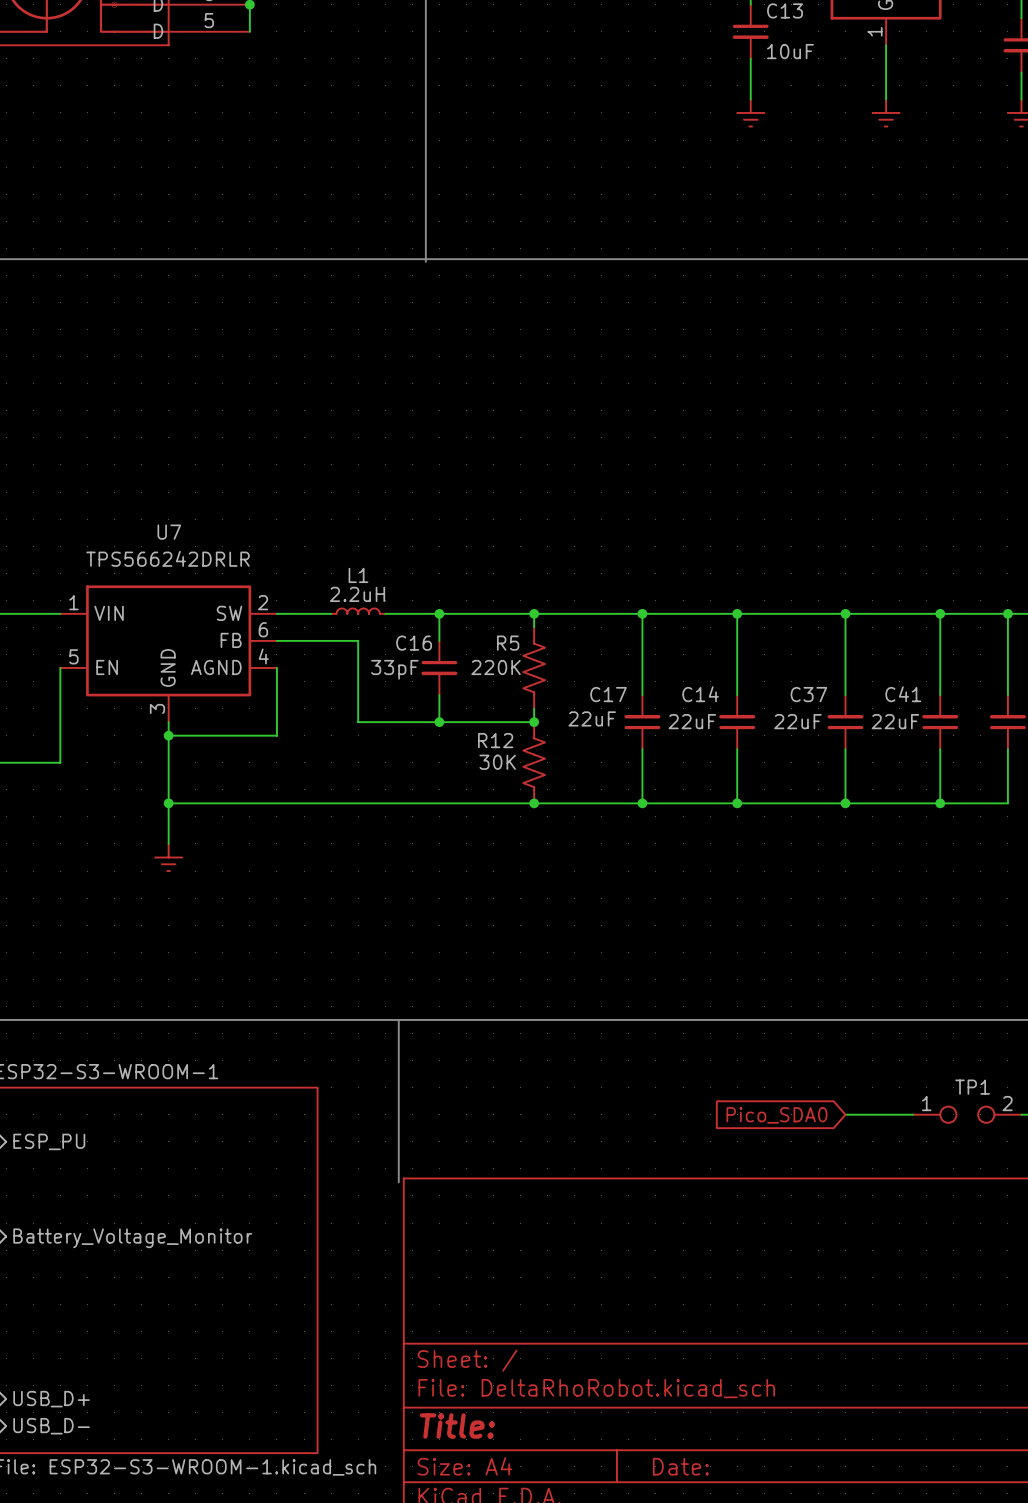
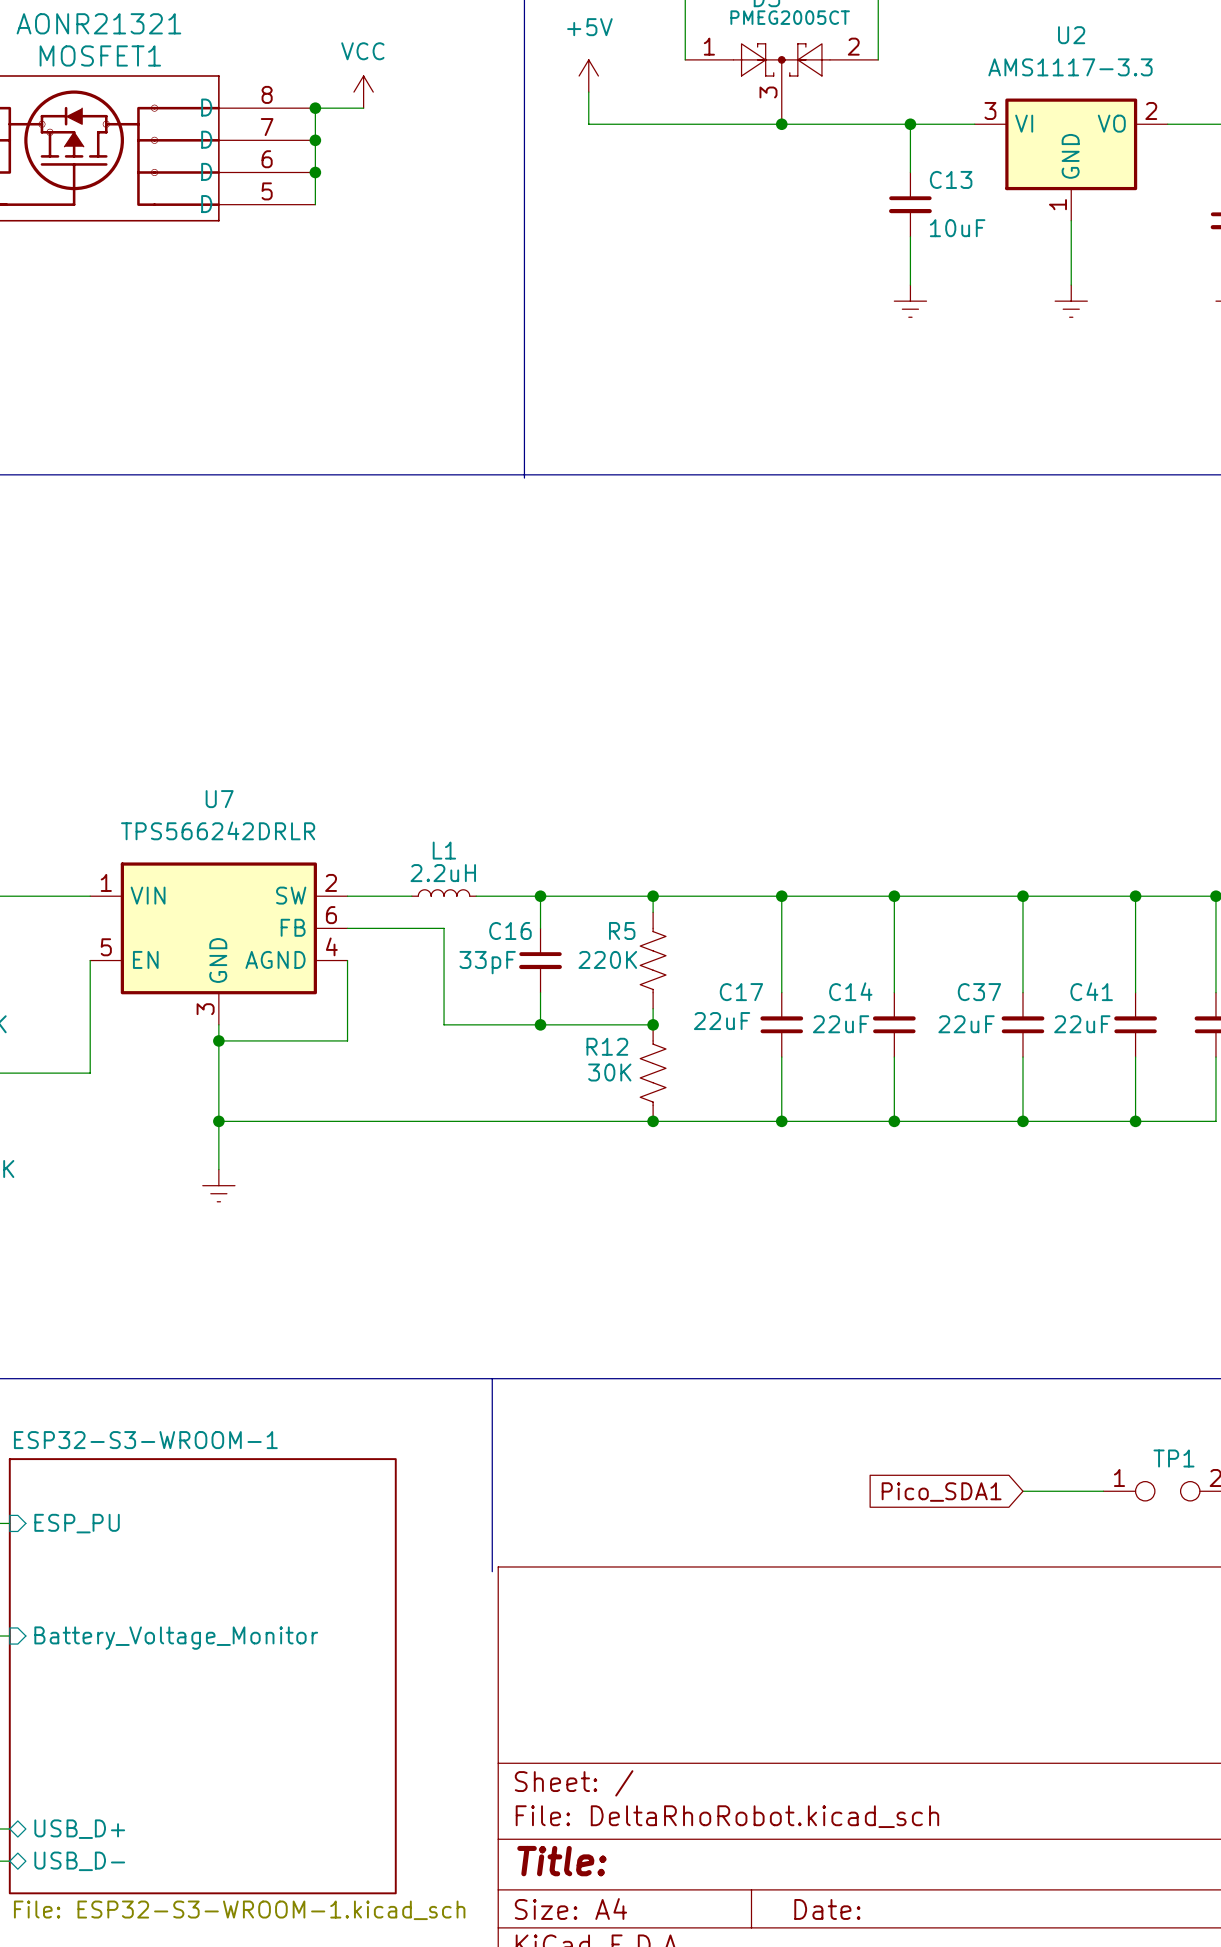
global label: Pico_SDA0 (776, 1115) -> Pico_SDA1 (941, 1492)

